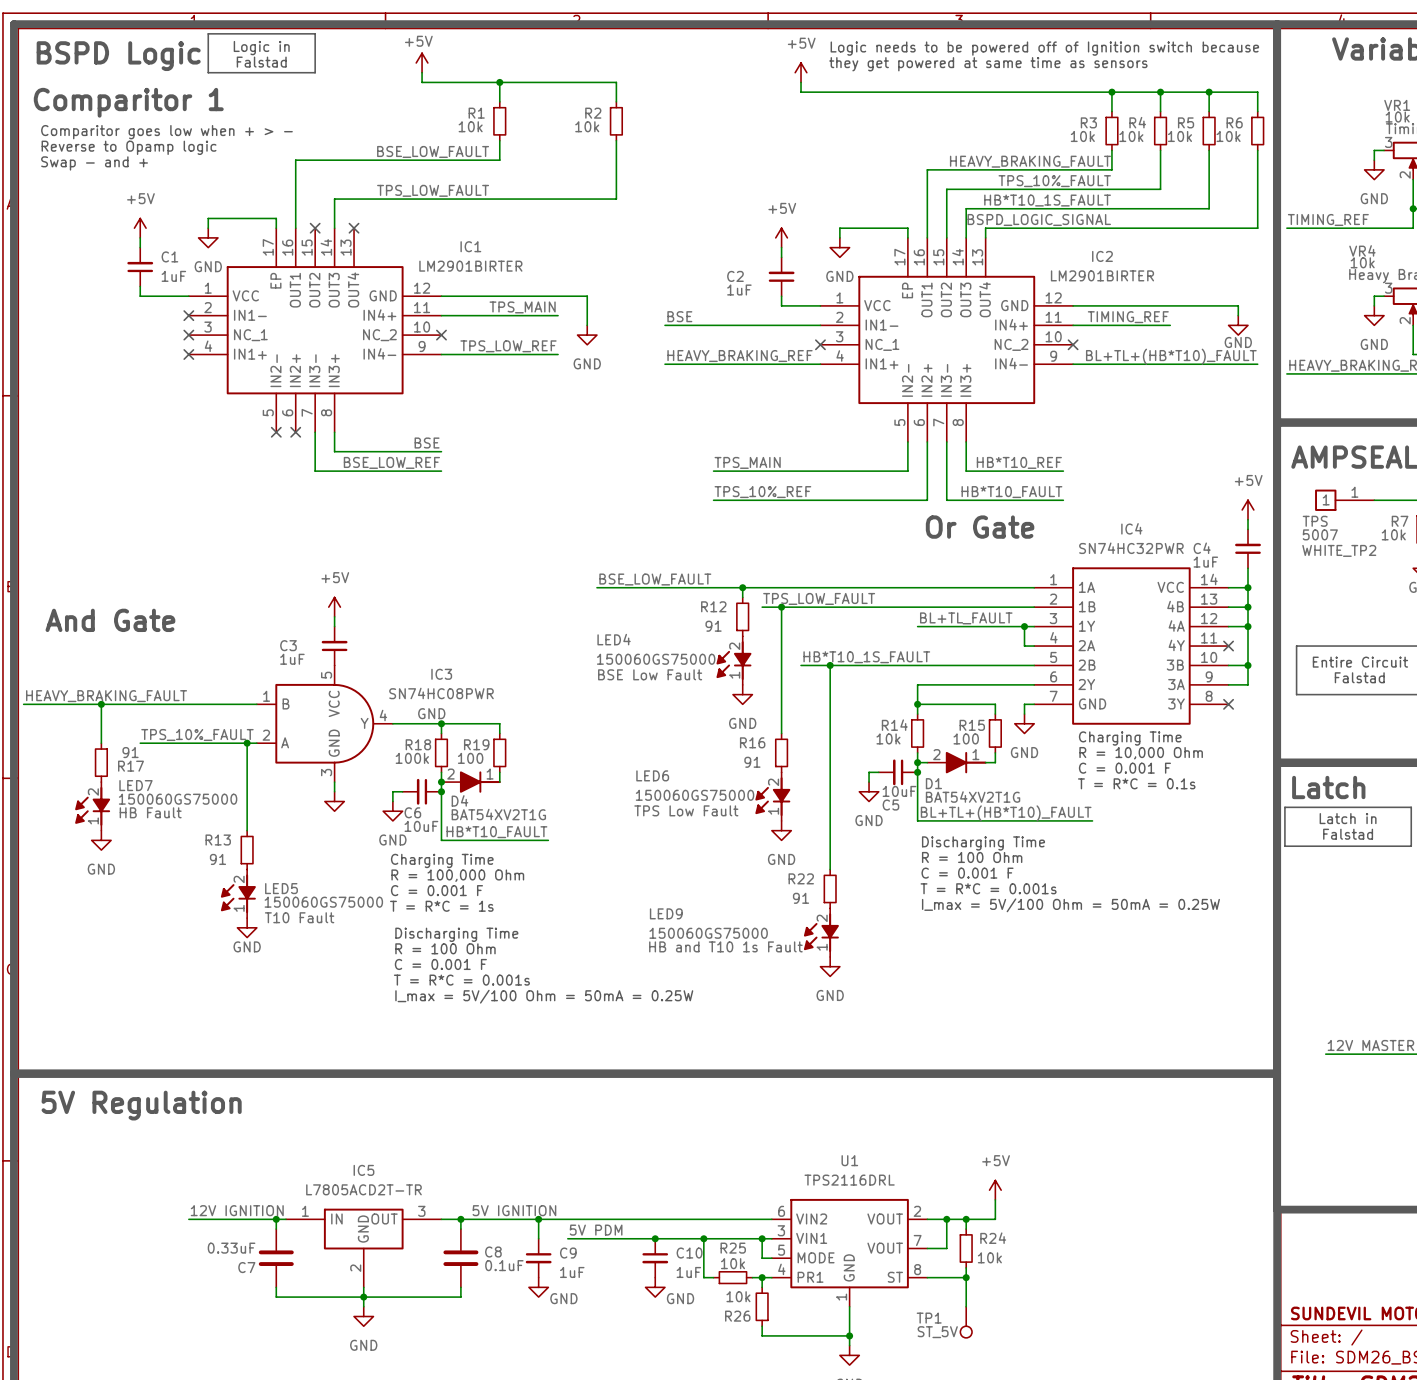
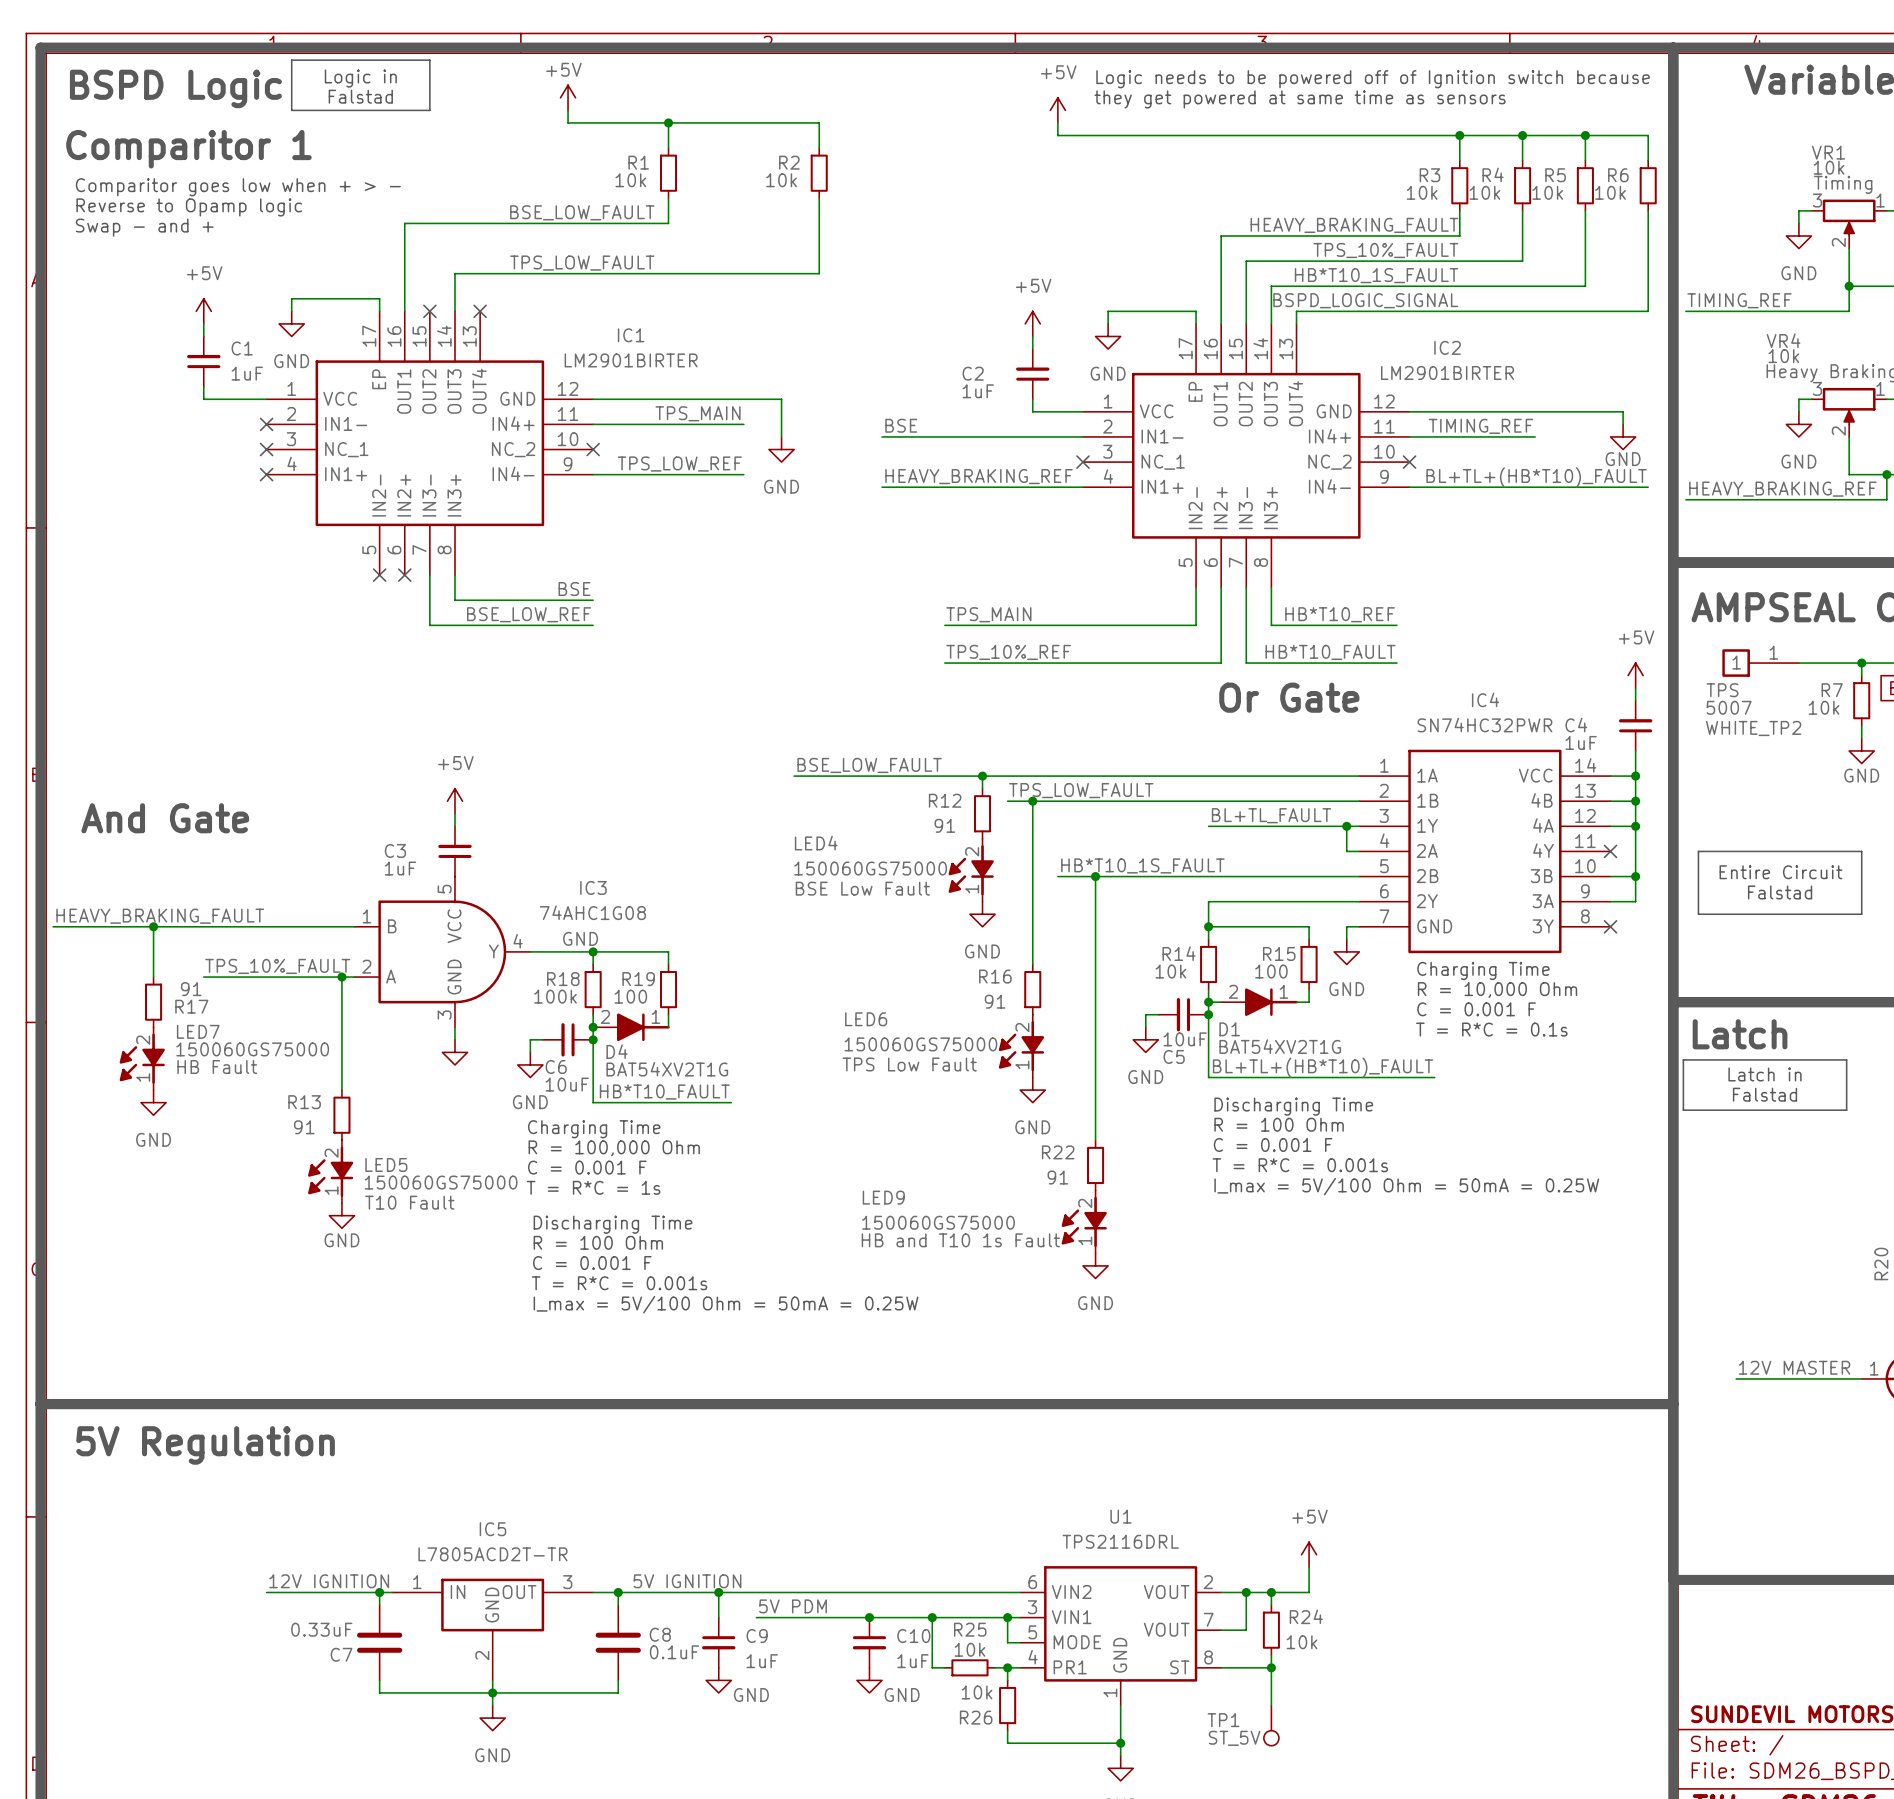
IC3 value: SN74HC08PWR (441, 693) -> 74AHC1G08 (592, 912)

